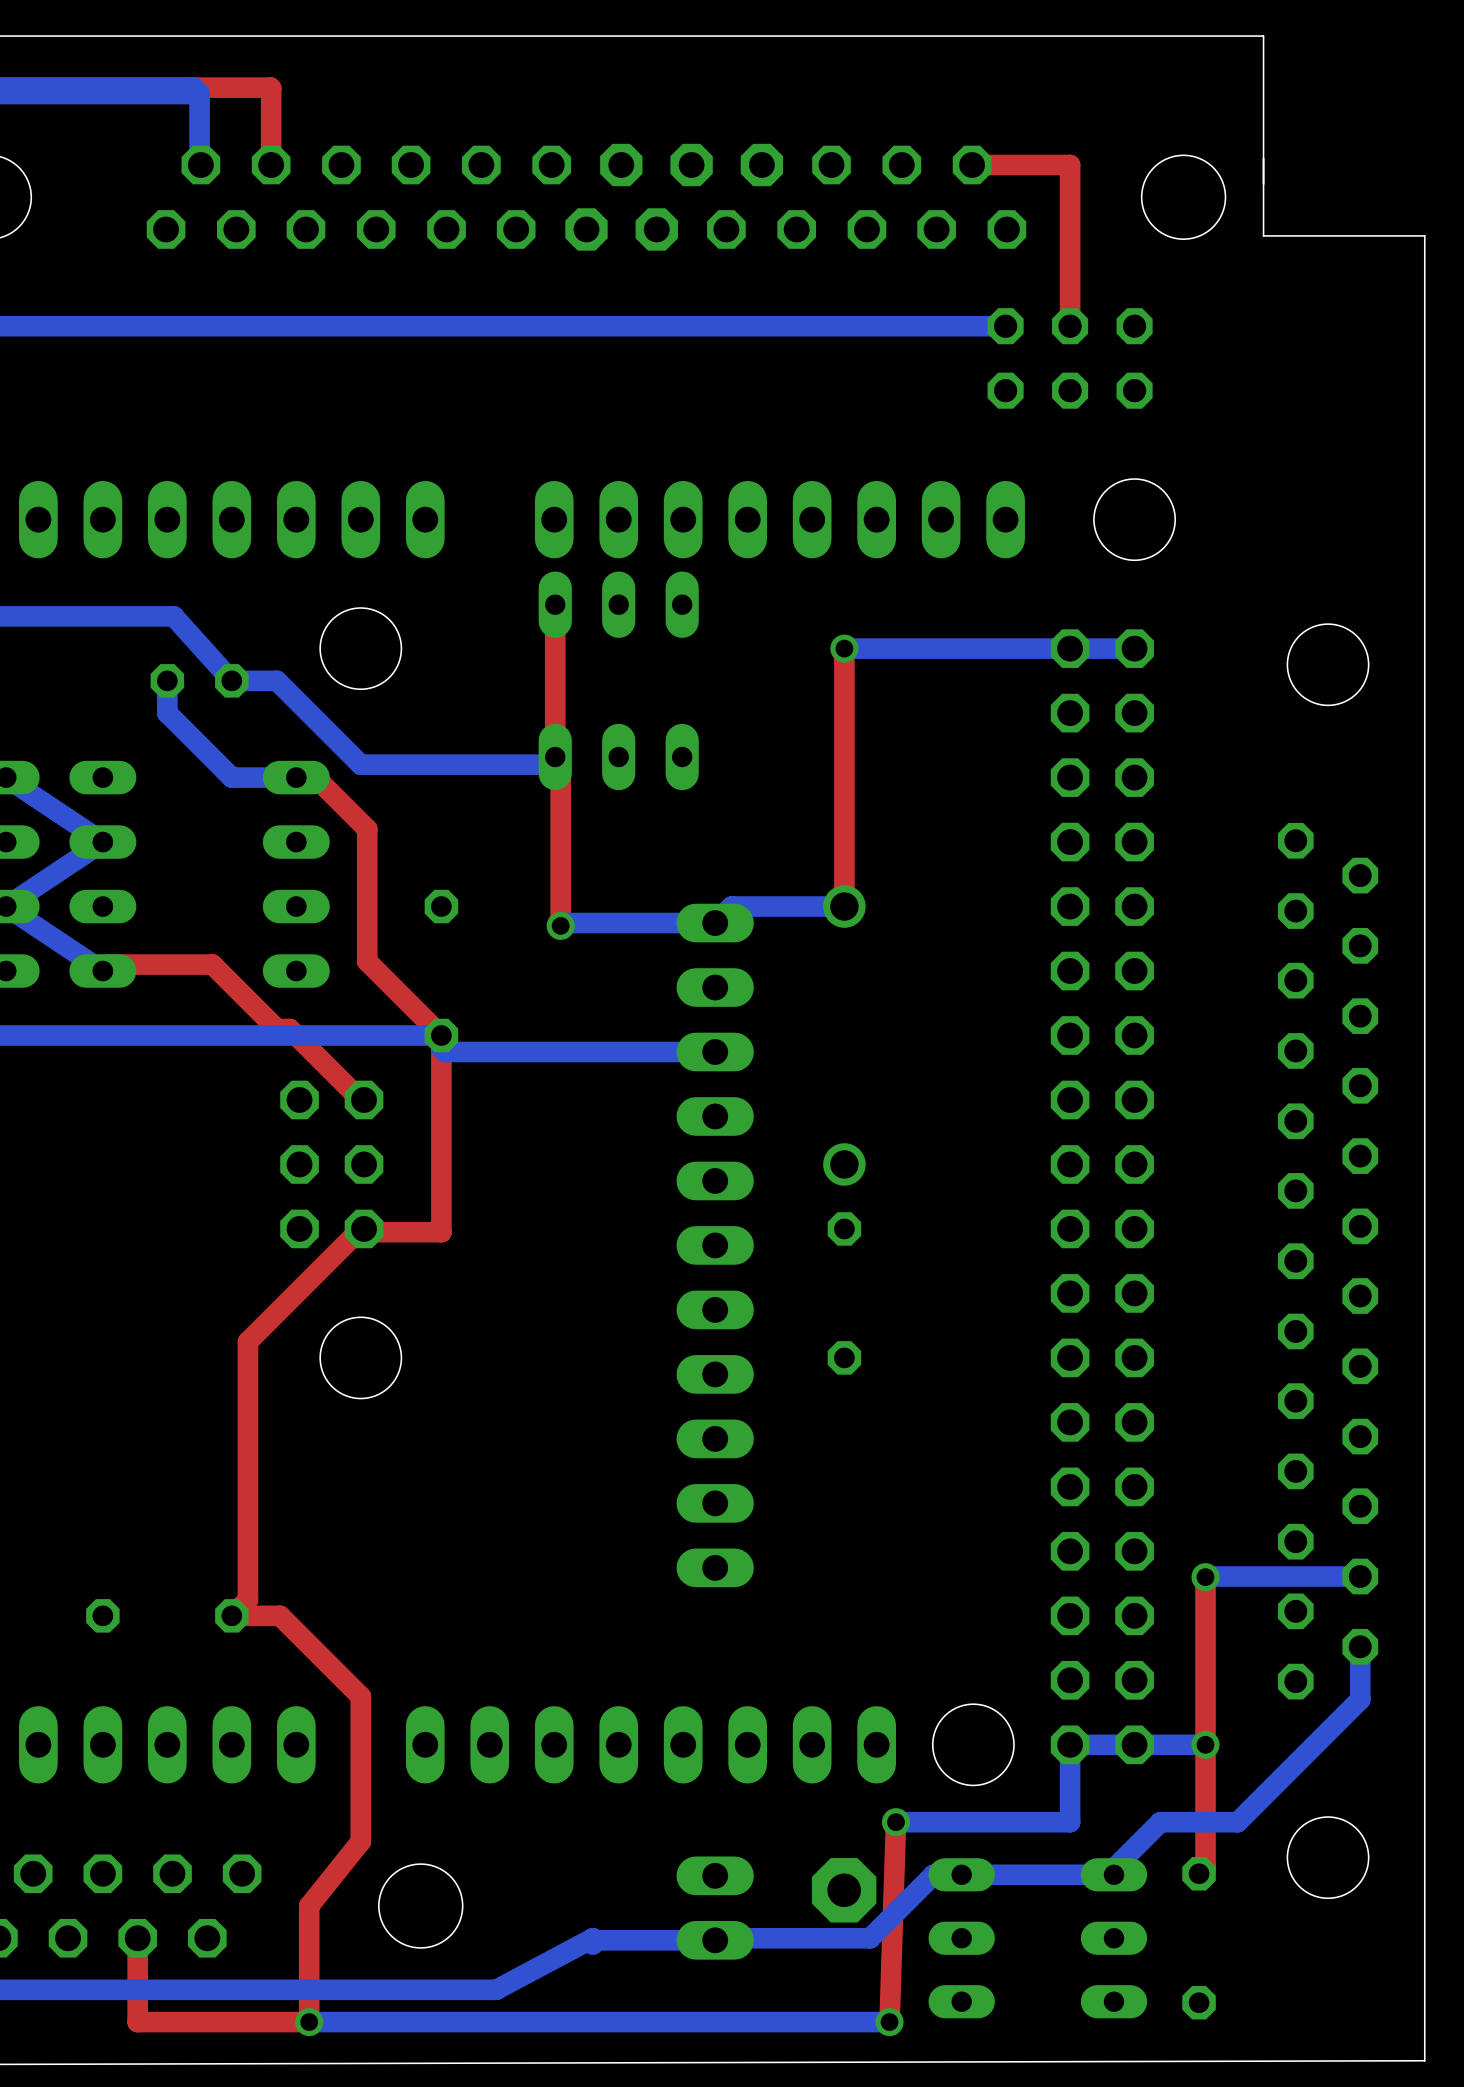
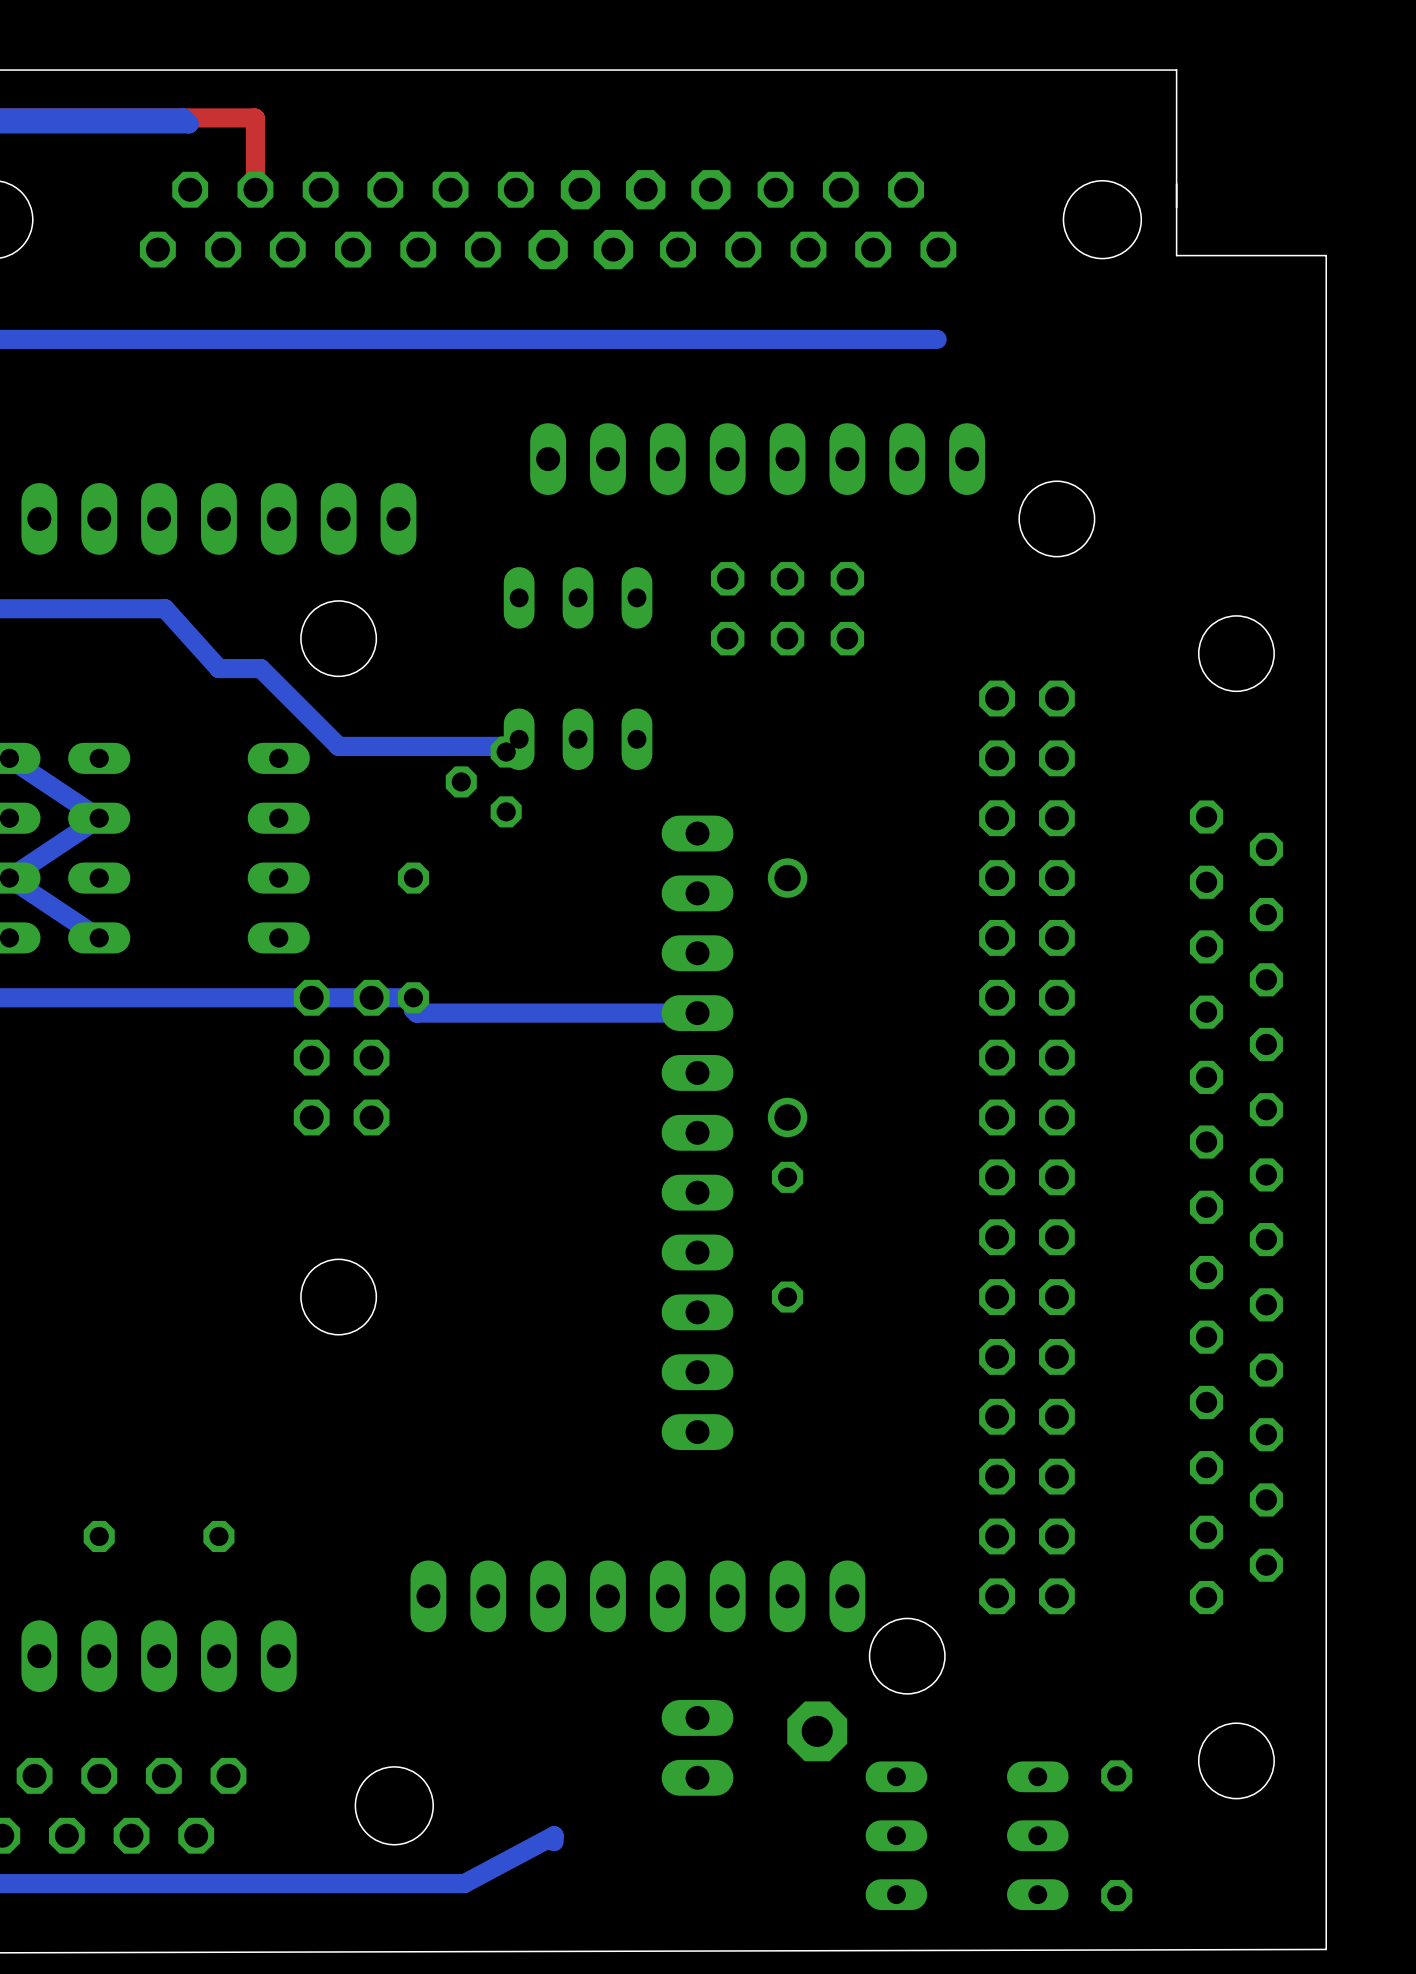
bottom track: (199, 94) (200, 164) -> none
top track: (972, 164) (1070, 164) (1070, 326) -> none
part position: (1070, 358) -> (787, 608)
part position: (779, 519) -> (757, 459)
top track: (555, 604) (555, 757) (560, 762) (560, 925) -> none
top track: (844, 648) (844, 906) -> none
via: (844, 648) -> none
part: (1070, 648) -> none
bottom track: (1134, 648) (844, 648) -> none
part: (1134, 648) -> none
bottom track: (167, 680) (167, 713) (231, 777) (296, 777) -> none
part: (199, 680) -> none
top track: (296, 777) (315, 777) (367, 829) (367, 961) (441, 1035) (441, 1232) (364, 1232) (364, 1228) (360, 1228) (247, 1341) (247, 1599) (231, 1615) (280, 1615) (360, 1696) (360, 1841) (309, 1906) (309, 2022) (137, 2022) (137, 1938) -> none
part: none -> (483, 781)
bottom track: (844, 906) (731, 906) (715, 923) (563, 923) (560, 925) -> none
via: (560, 925) -> none
top track: (102, 971) (109, 964) (212, 964) (276, 1029) (289, 1029) (360, 1099) (364, 1099) -> none
part position: (331, 1164) -> (341, 1057)
part position: (715, 1245) -> (697, 1132)
bottom track: (1360, 1576) (1205, 1577) -> none
top track: (1205, 1577) (1205, 1867) (1203, 1871) (1199, 1873) -> none
via: (1205, 1577) -> none
bottom track: (1360, 1646) (1360, 1699) (1237, 1822) (1160, 1822) (1114, 1868) (1114, 1874) (933, 1874) (870, 1938) (592, 1940) -> none
part position: (650, 1744) -> (637, 1596)
part: (1070, 1744) -> none
part: (1134, 1744) -> none
bottom track: (1205, 1744) (1070, 1744) (1070, 1822) (895, 1822) -> none
via: (1205, 1744) -> none
top track: (895, 1822) (889, 2022) -> none
via: (895, 1822) -> none
part position: (844, 1890) -> (817, 1731)
part position: (715, 1908) -> (697, 1747)
via: (309, 2022) -> none
bottom track: (889, 2022) (309, 2022) -> none
via: (889, 2022) -> none

